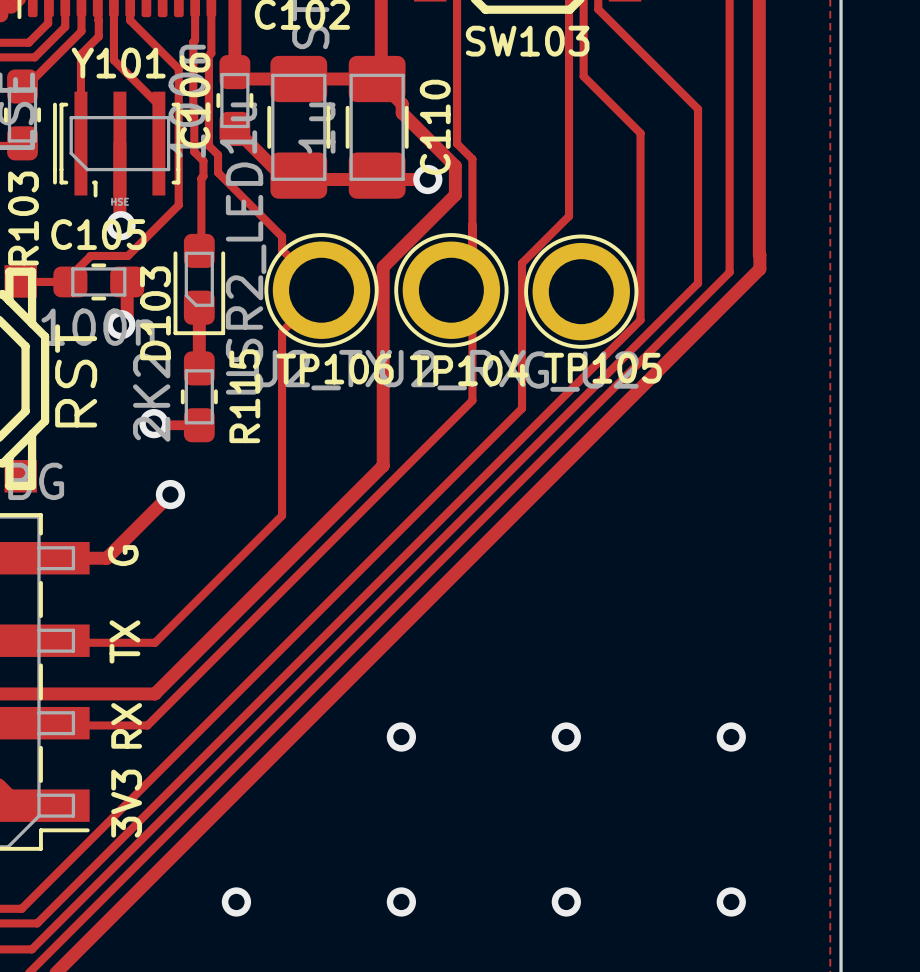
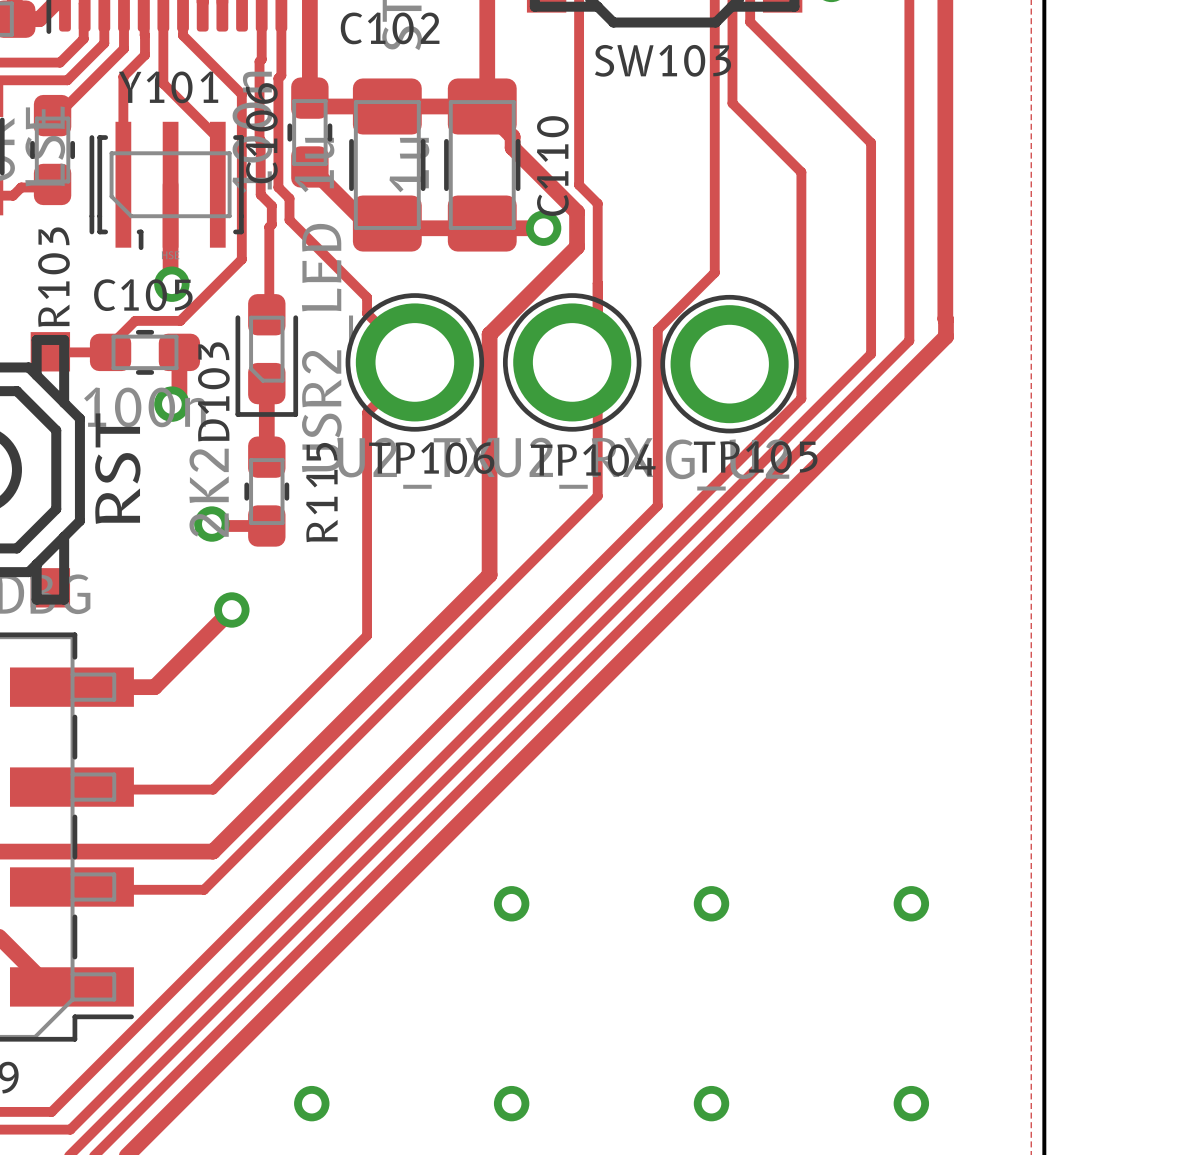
text: G (123, 555) -> none
text: TX (124, 641) -> none
text: RX (126, 725) -> none
text: 3V3 (126, 803) -> none

